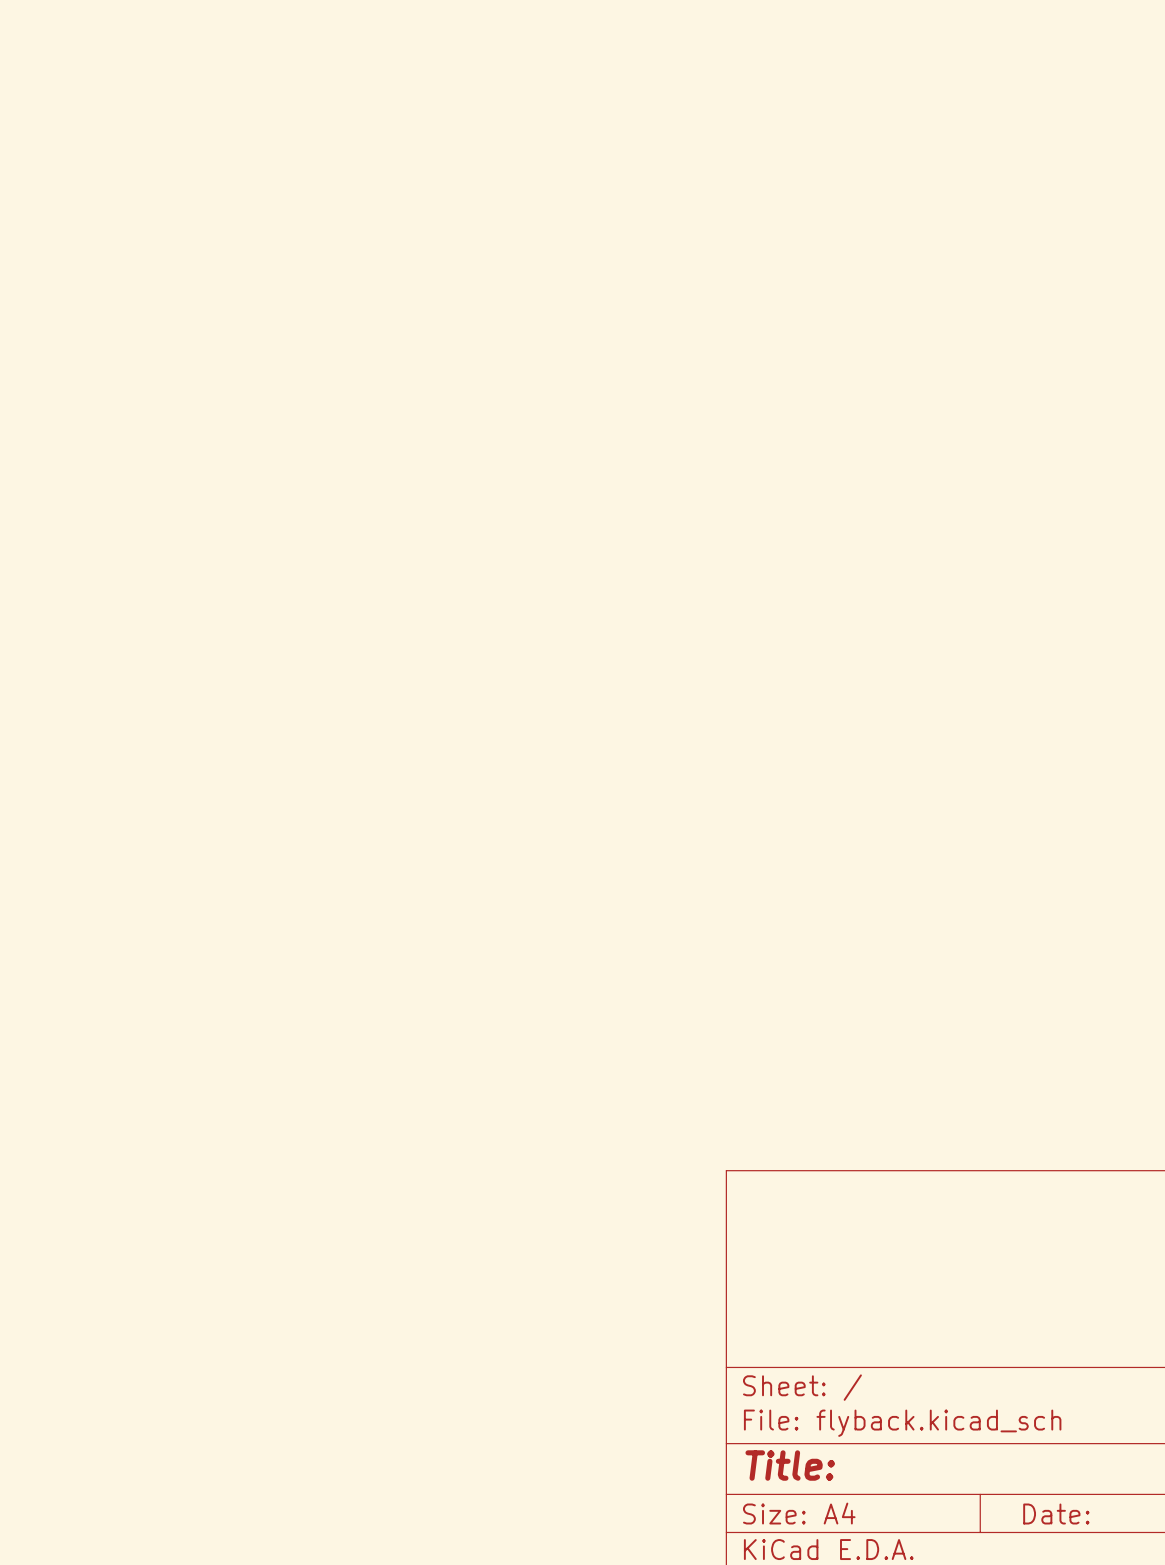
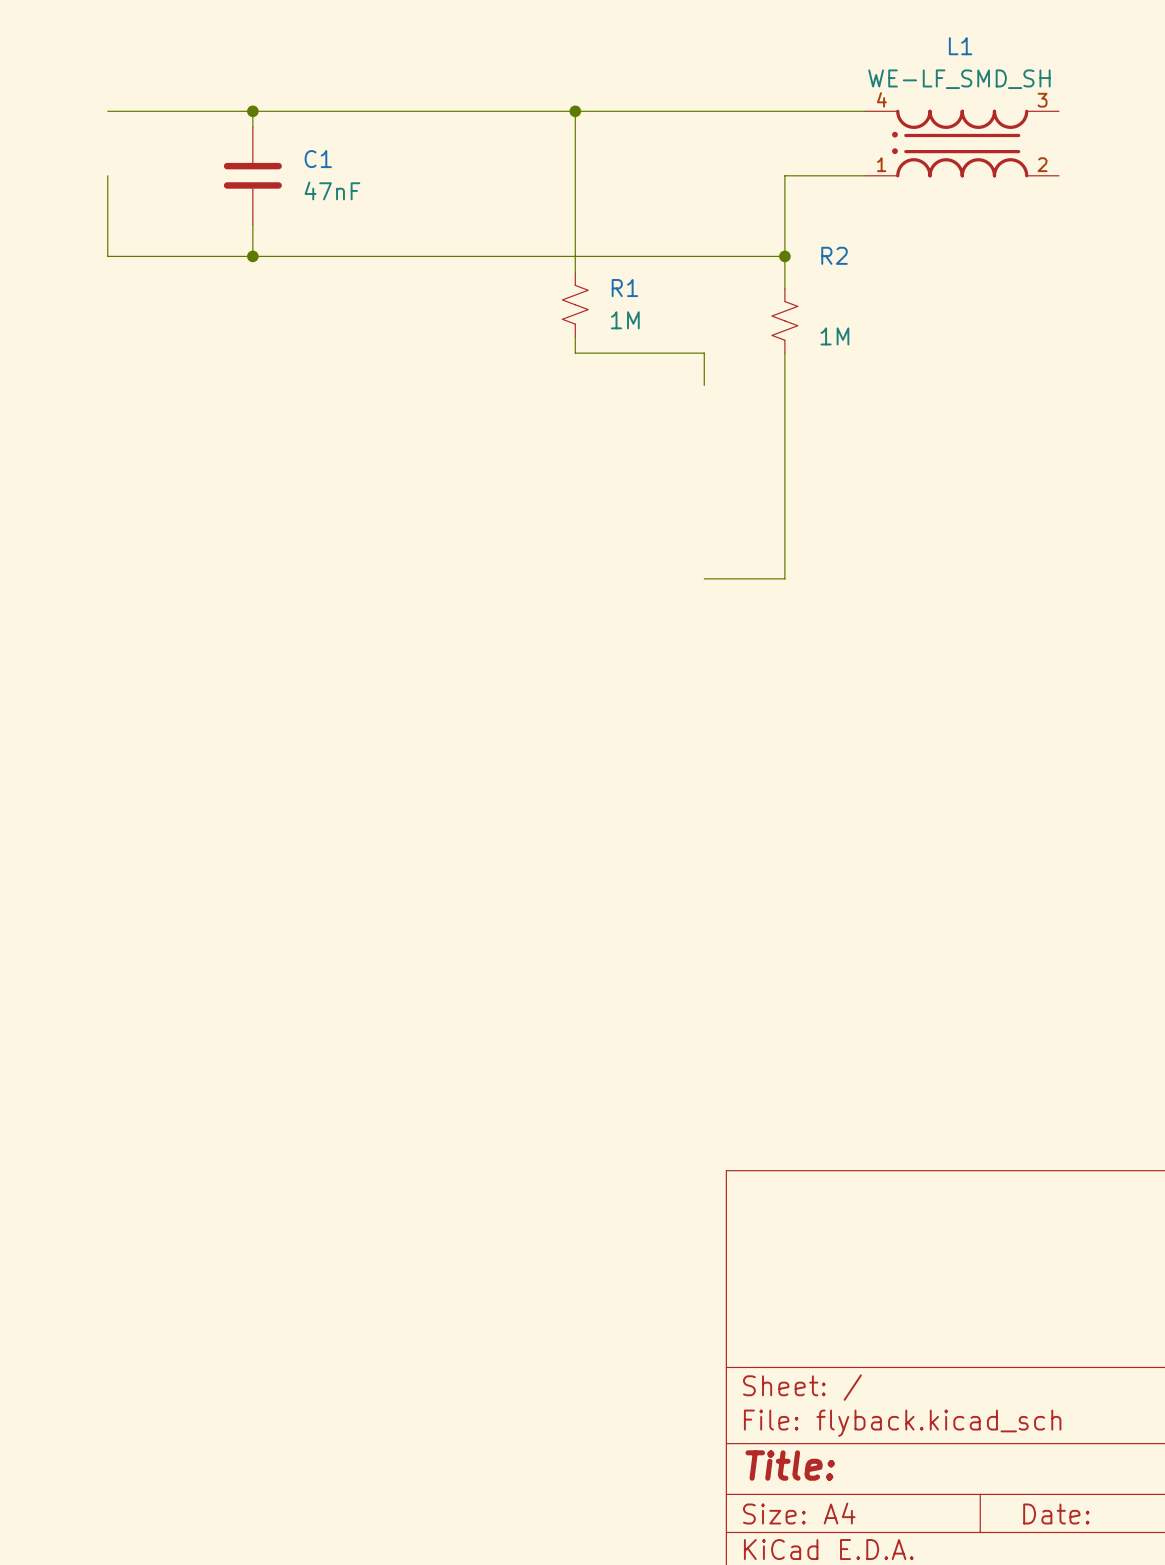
wire: none -> (107, 111) (865, 111)
wire: none -> (252, 111) (252, 127)
junction: none -> (252, 111)
wire: none -> (575, 111) (575, 272)
junction: none -> (575, 111)
L1: none -> WE-LF_SMD_SH (962, 143)
wire: none -> (107, 175) (107, 256) (784, 256)
C1: none -> 47nF (252, 175)
wire: none -> (865, 175) (784, 175) (784, 288)
wire: none -> (252, 224) (252, 256)
junction: none -> (252, 256)
junction: none -> (784, 256)
R1: none -> 1M (575, 304)
R2: none -> 1M (784, 320)
wire: none -> (575, 337) (575, 353) (704, 353) (704, 385)
wire: none -> (784, 353) (784, 578) (704, 578)

